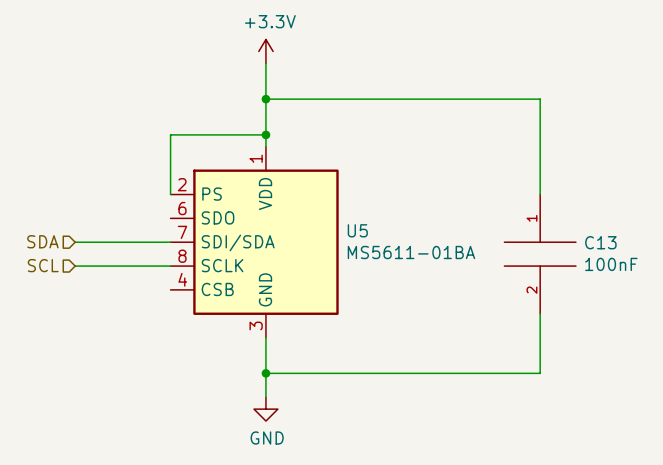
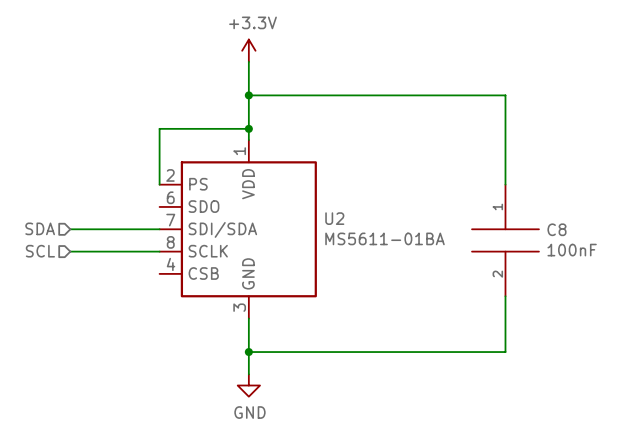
U5 name: U5 (357, 230) -> U2 (334, 218)
C13 name: C13 (600, 242) -> C8 (556, 229)

